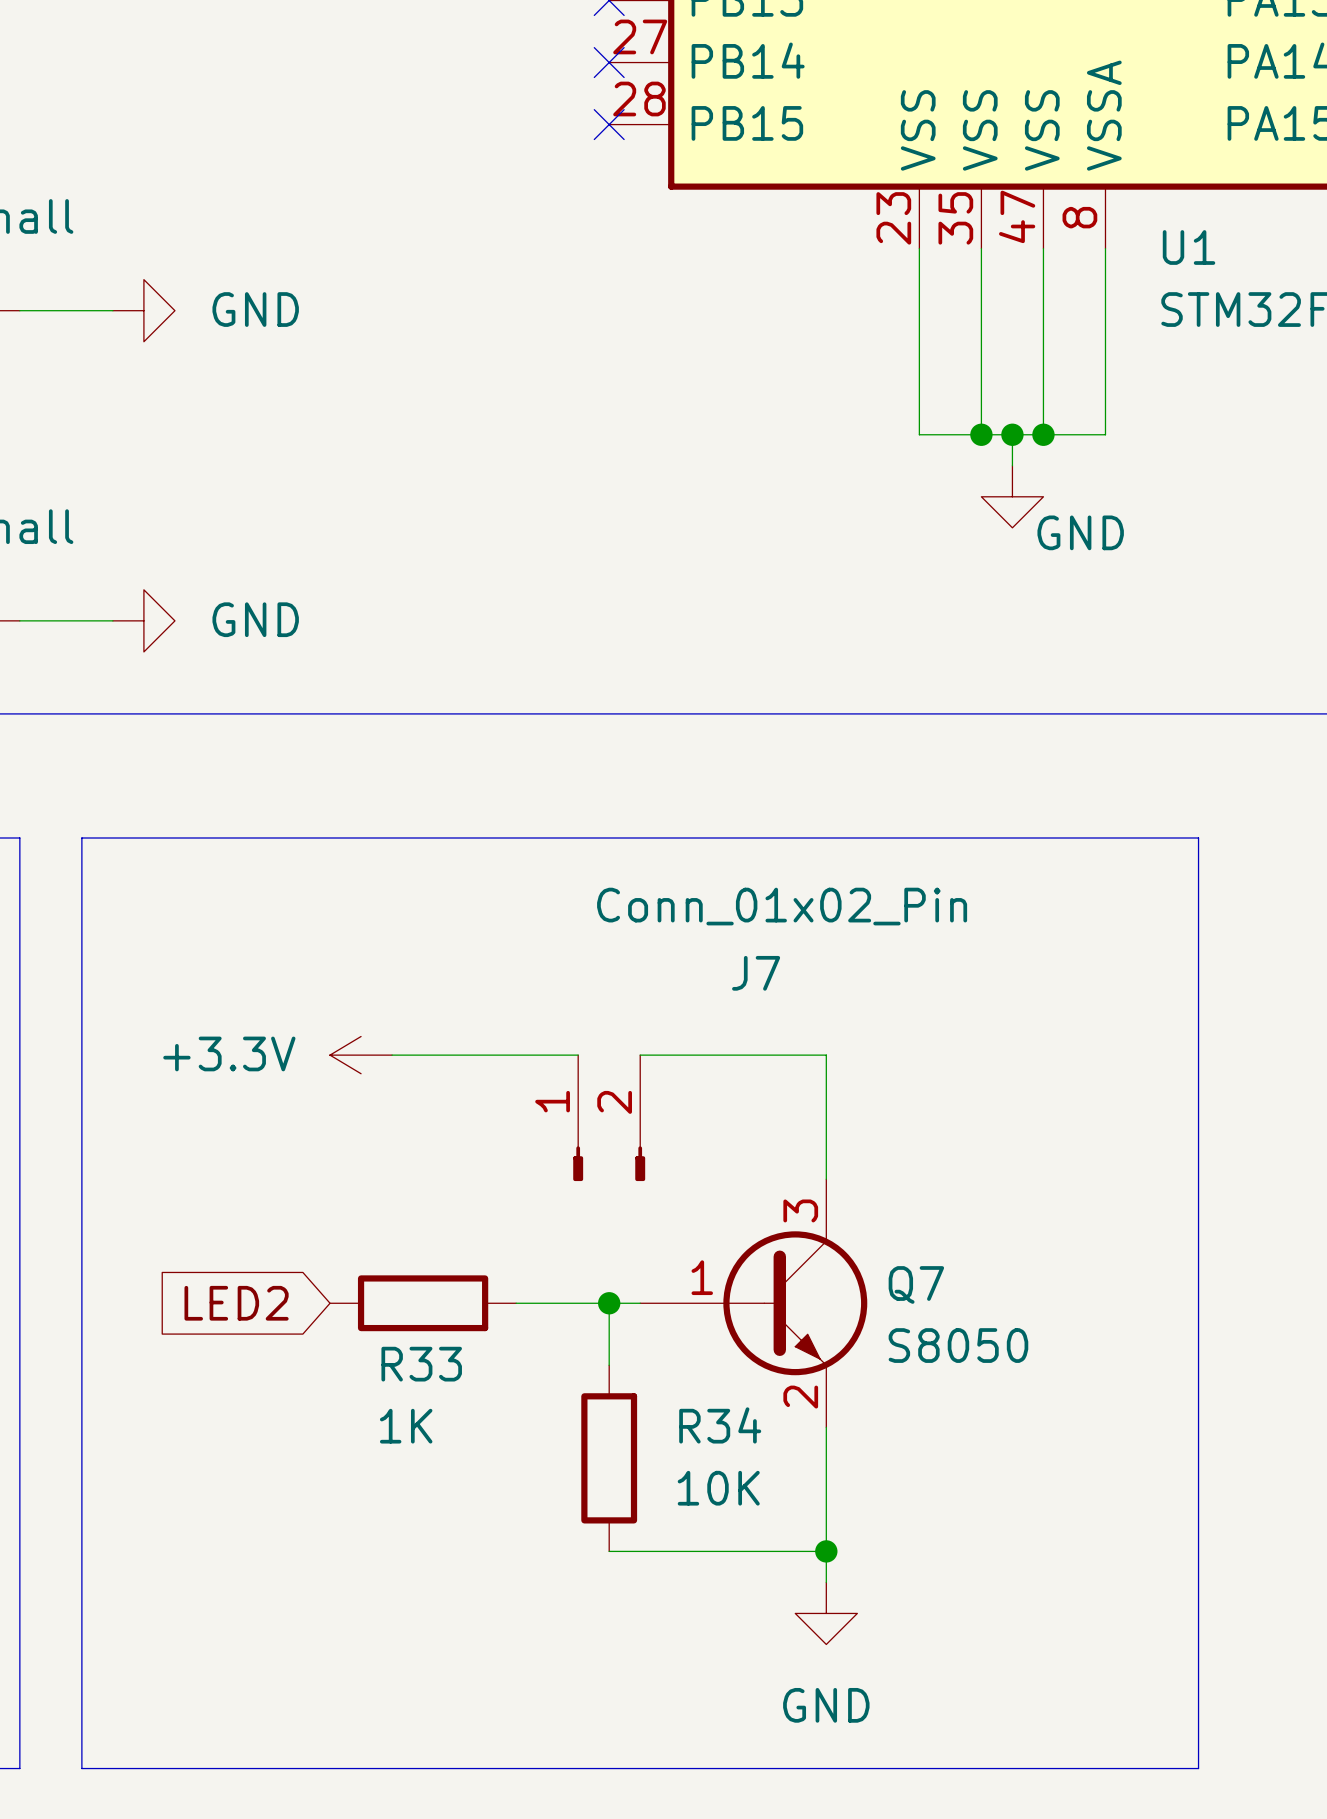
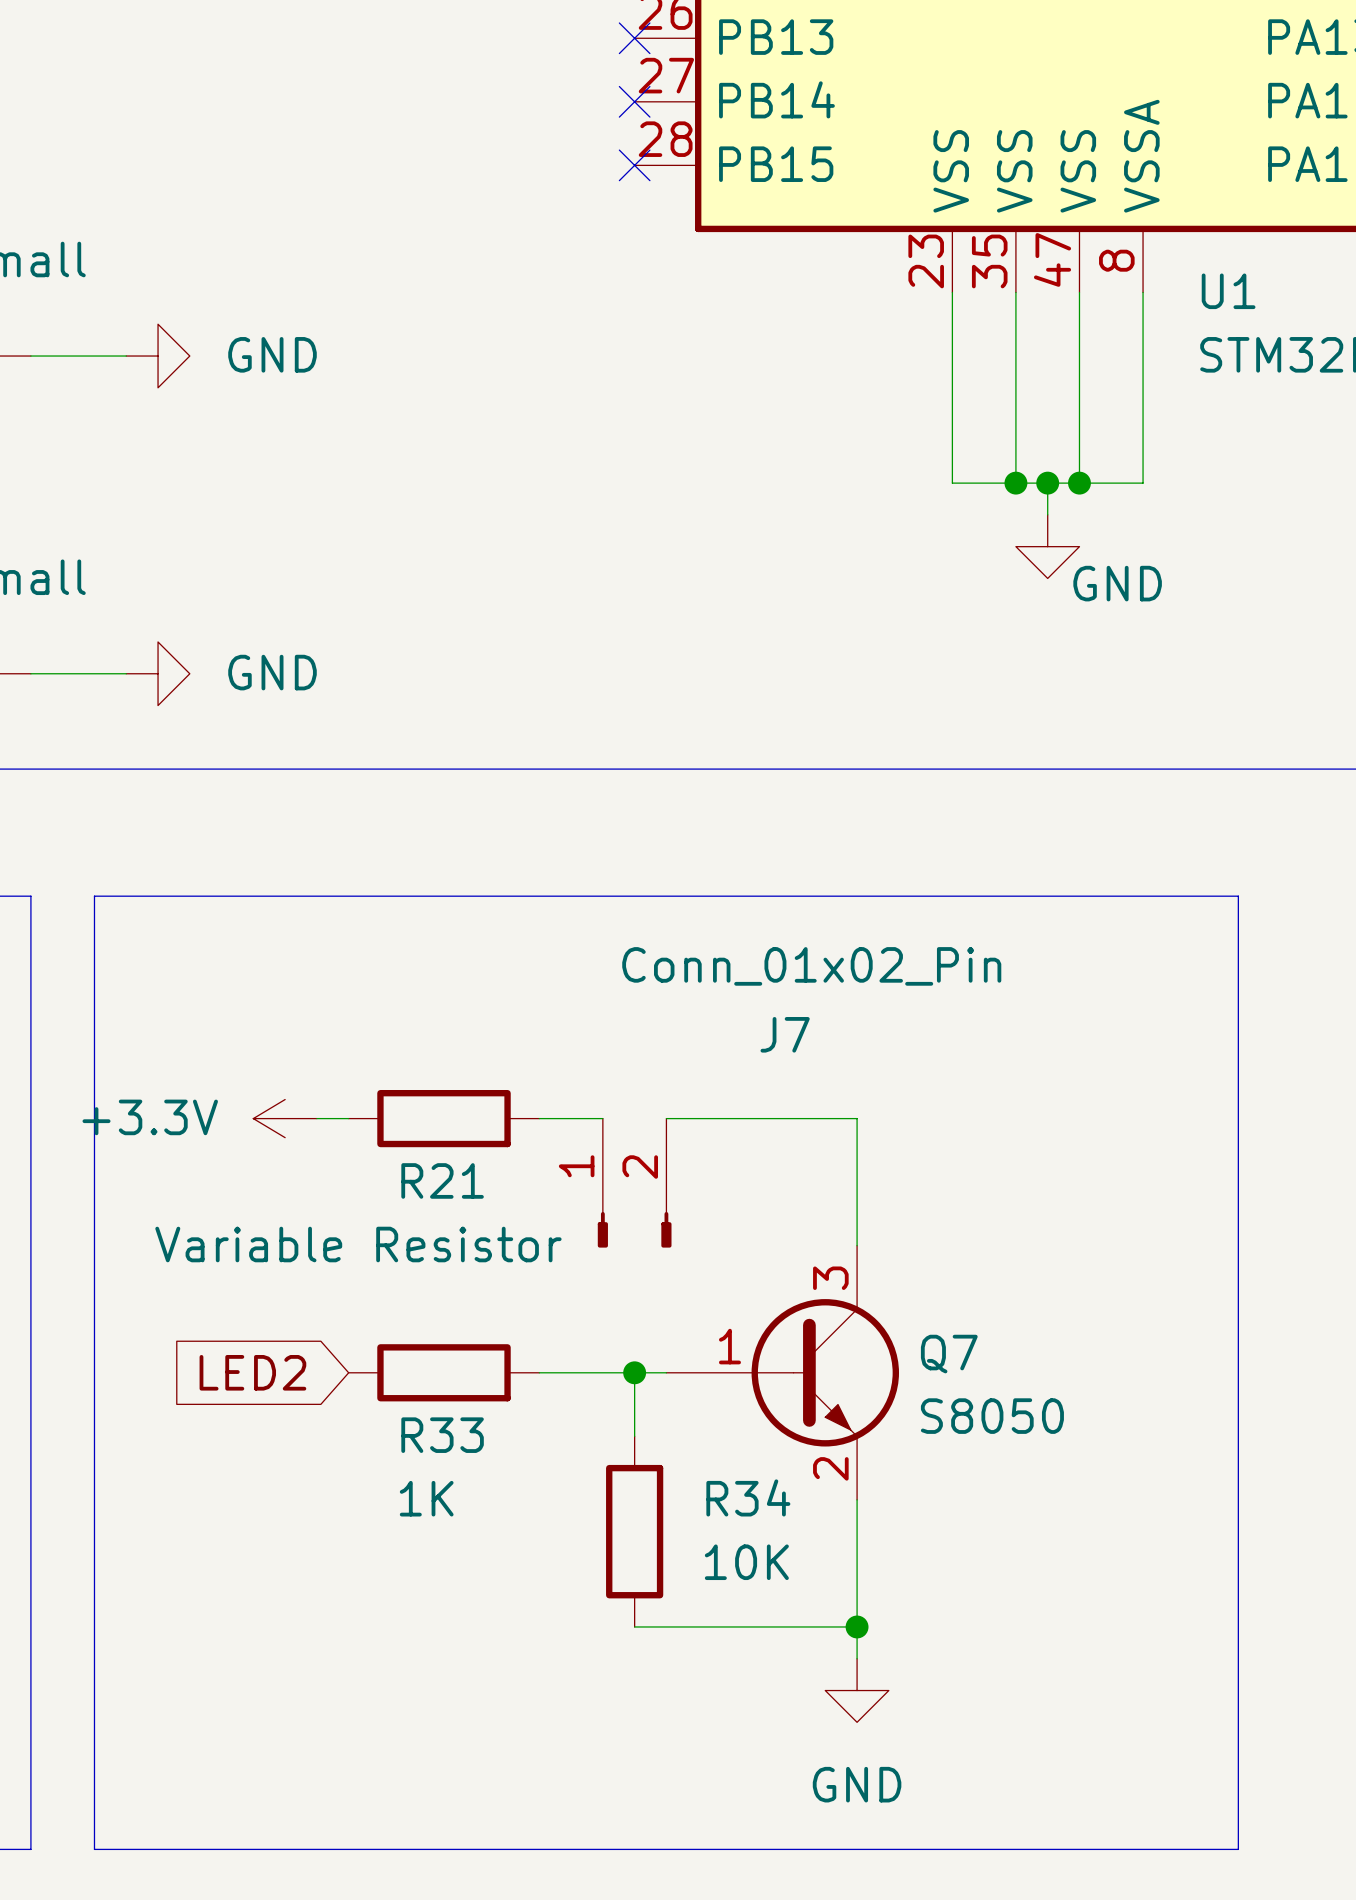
wire: none -> (316, 1118) (348, 1118)
power symbol position: +3.3V (361, 1055) -> +3.3V (285, 1118)
wire: (392, 1055) (516, 1055) -> none
R21: none -> Variable Resistor (444, 1118)

